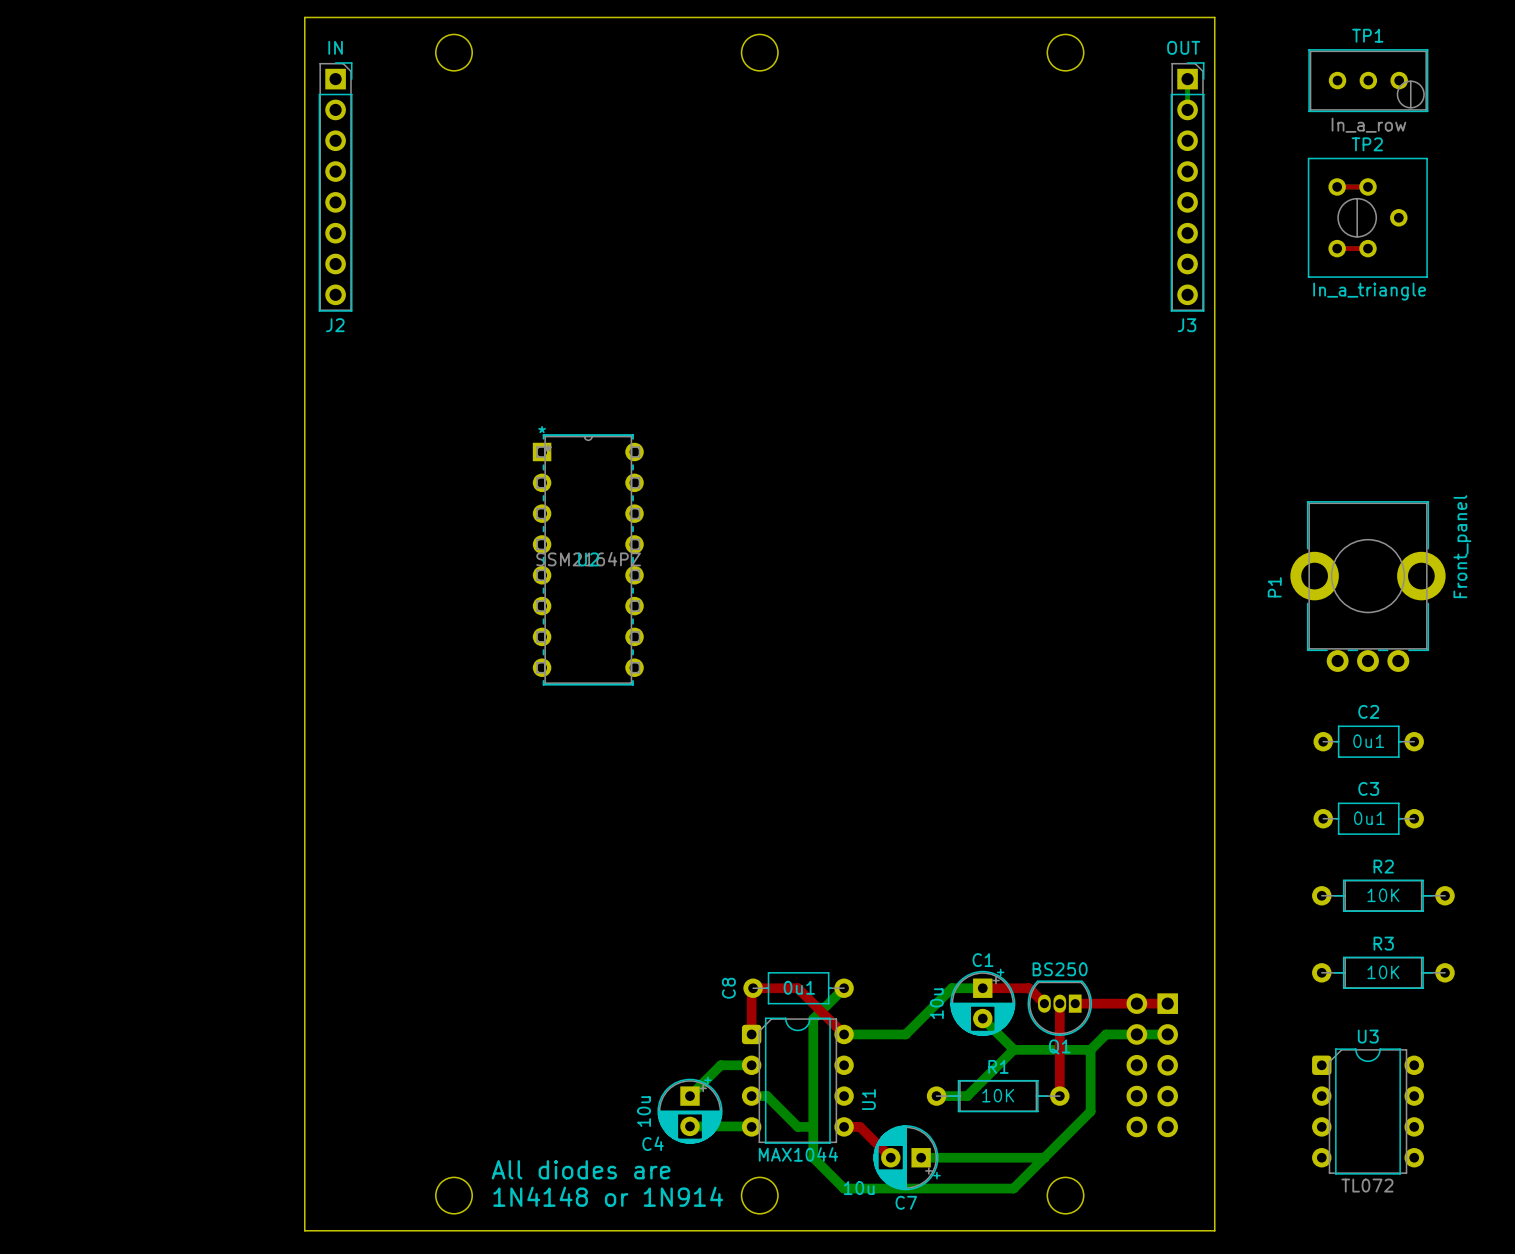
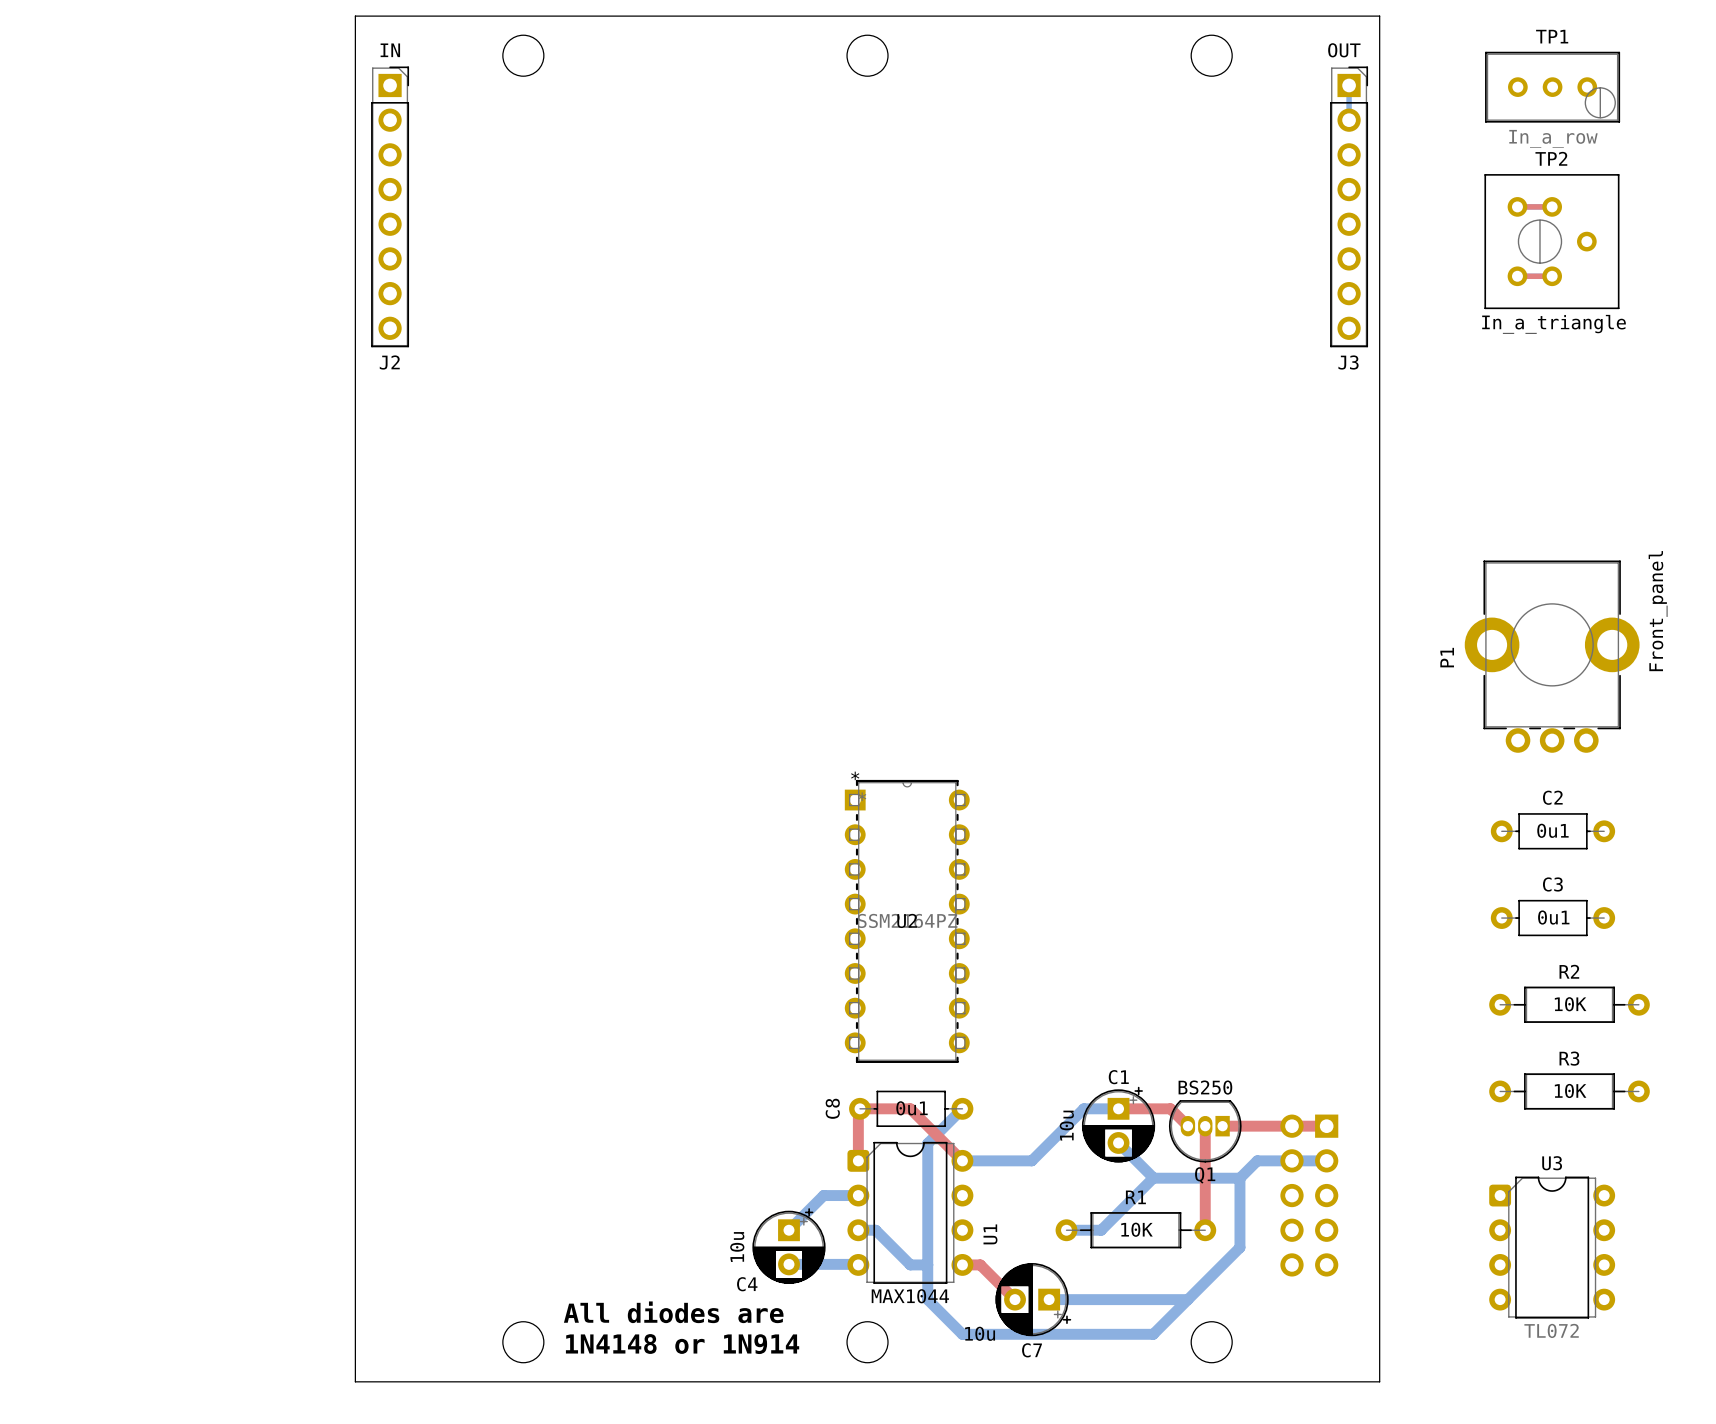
U2 position: (588, 559) -> (907, 921)

